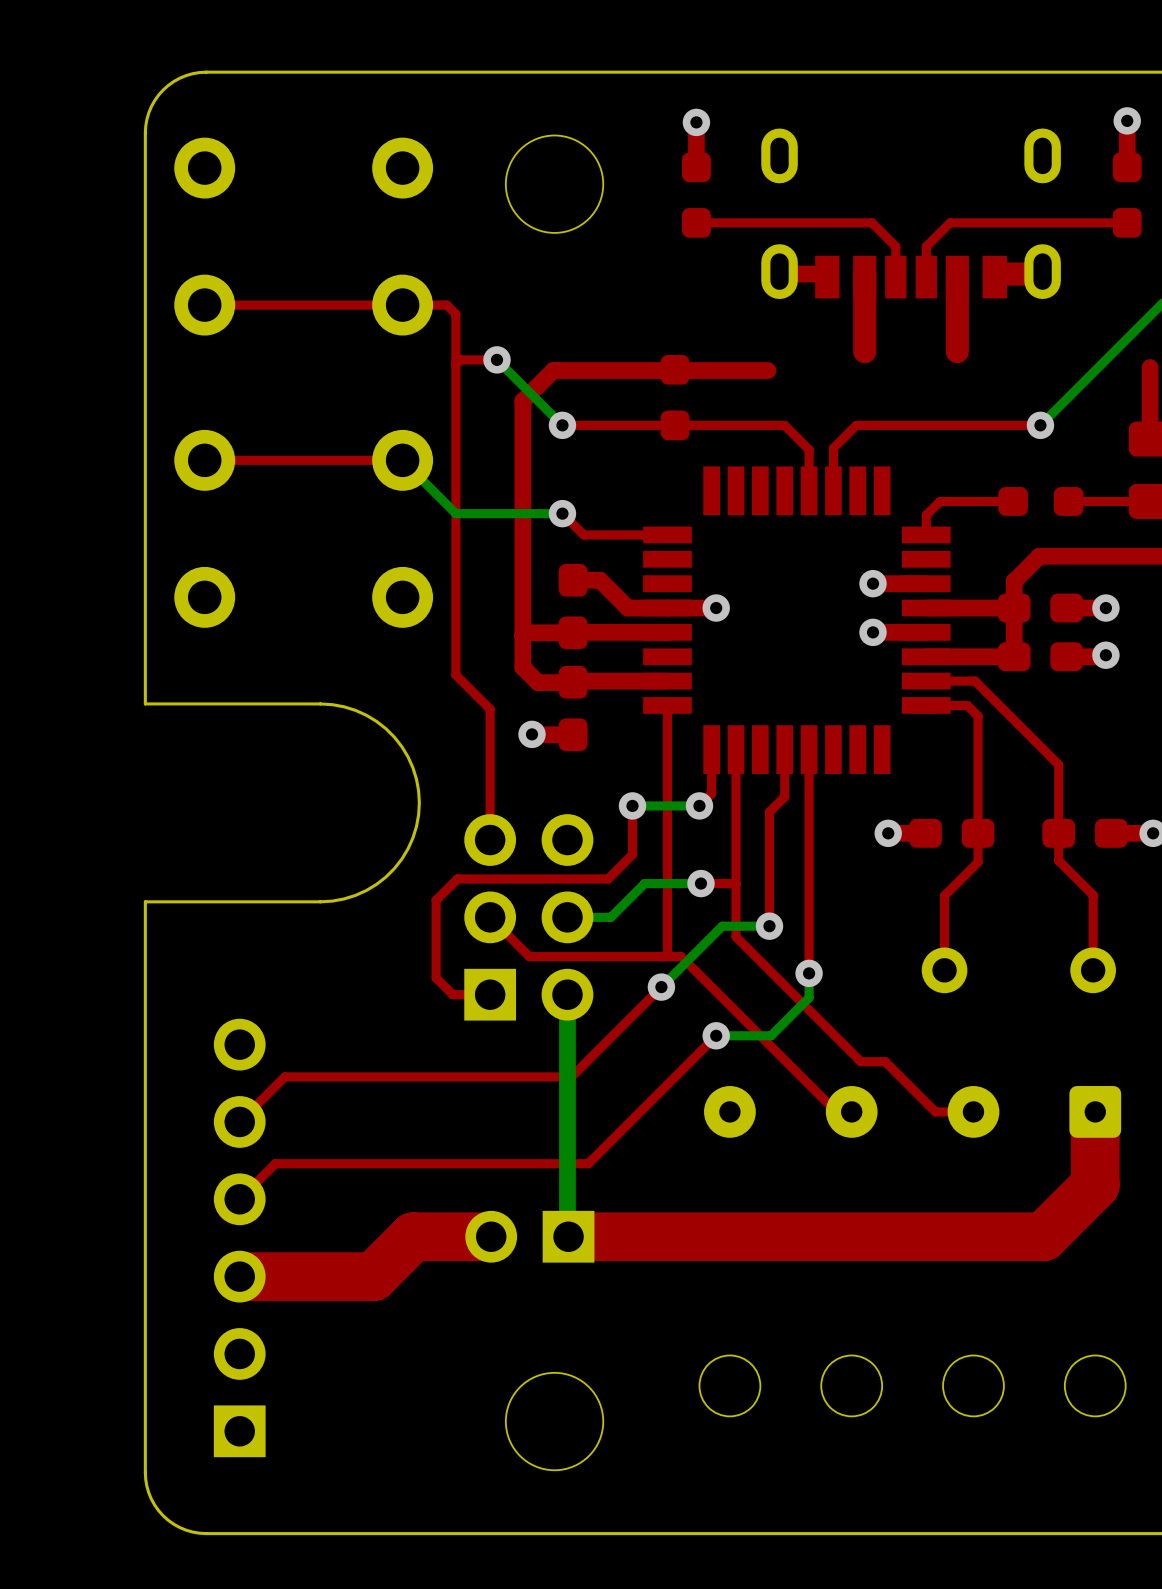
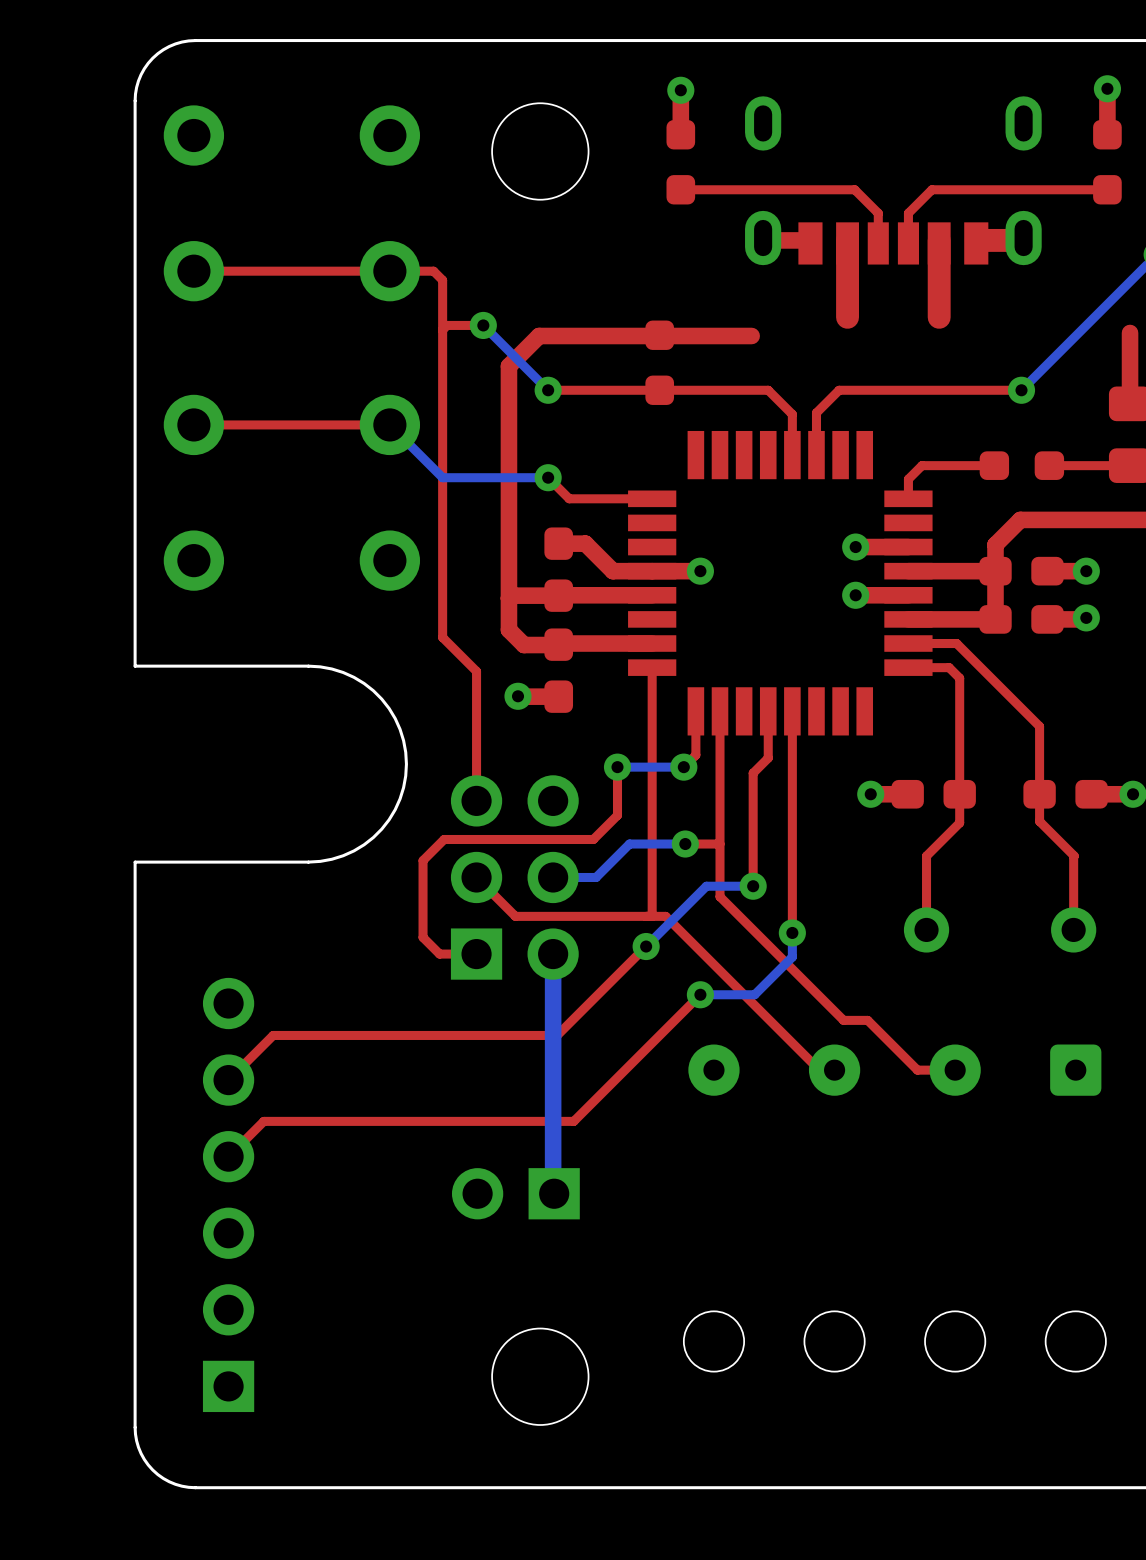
top track: (1095, 1111) (1095, 1184) (1043, 1236) (568, 1236) -> none
top track: (491, 1236) (413, 1236) (373, 1276) (239, 1276) -> none

